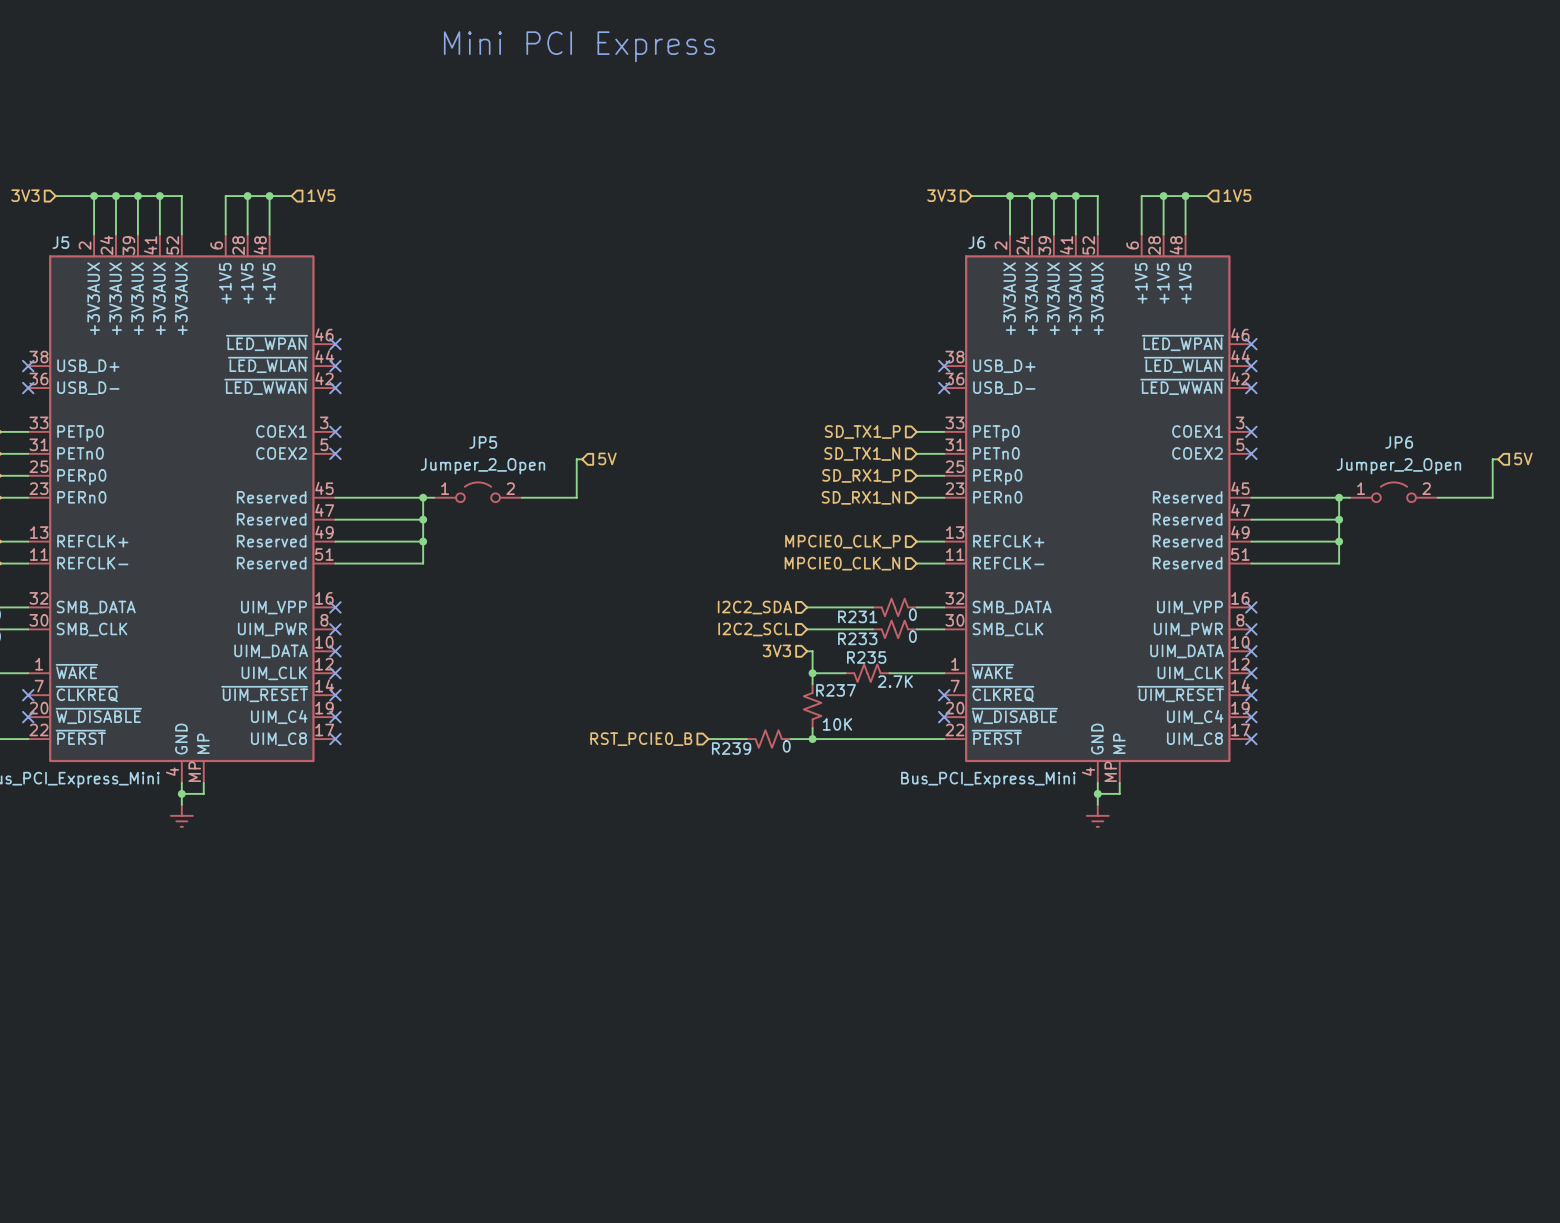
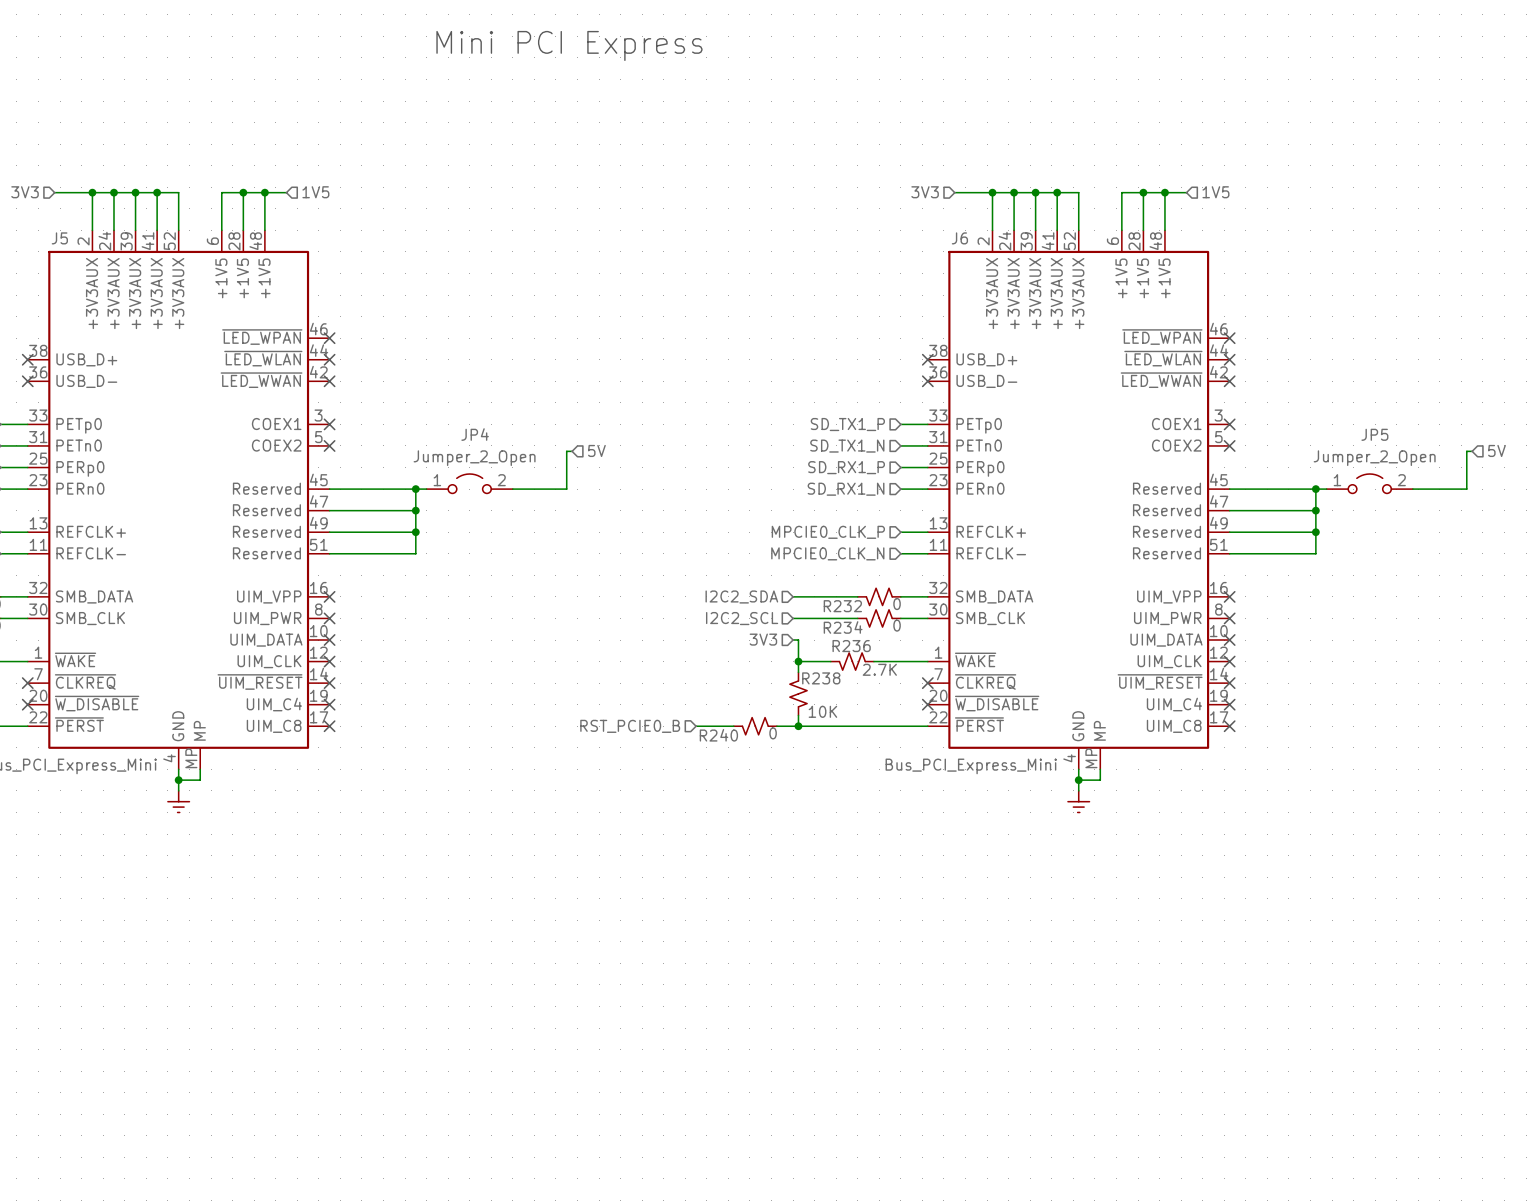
JP5 name: JP5 (483, 442) -> JP4 (475, 434)
JP6 name: JP6 (1399, 442) -> JP5 (1374, 434)
R231 name: R231 (857, 616) -> R232 (842, 606)
R233 name: R233 (857, 638) -> R234 (843, 627)
R235 name: R235 (866, 657) -> R236 (851, 646)
R237 name: R237 (836, 690) -> R238 (821, 678)
R239 name: R239 (731, 748) -> R240 (718, 735)

